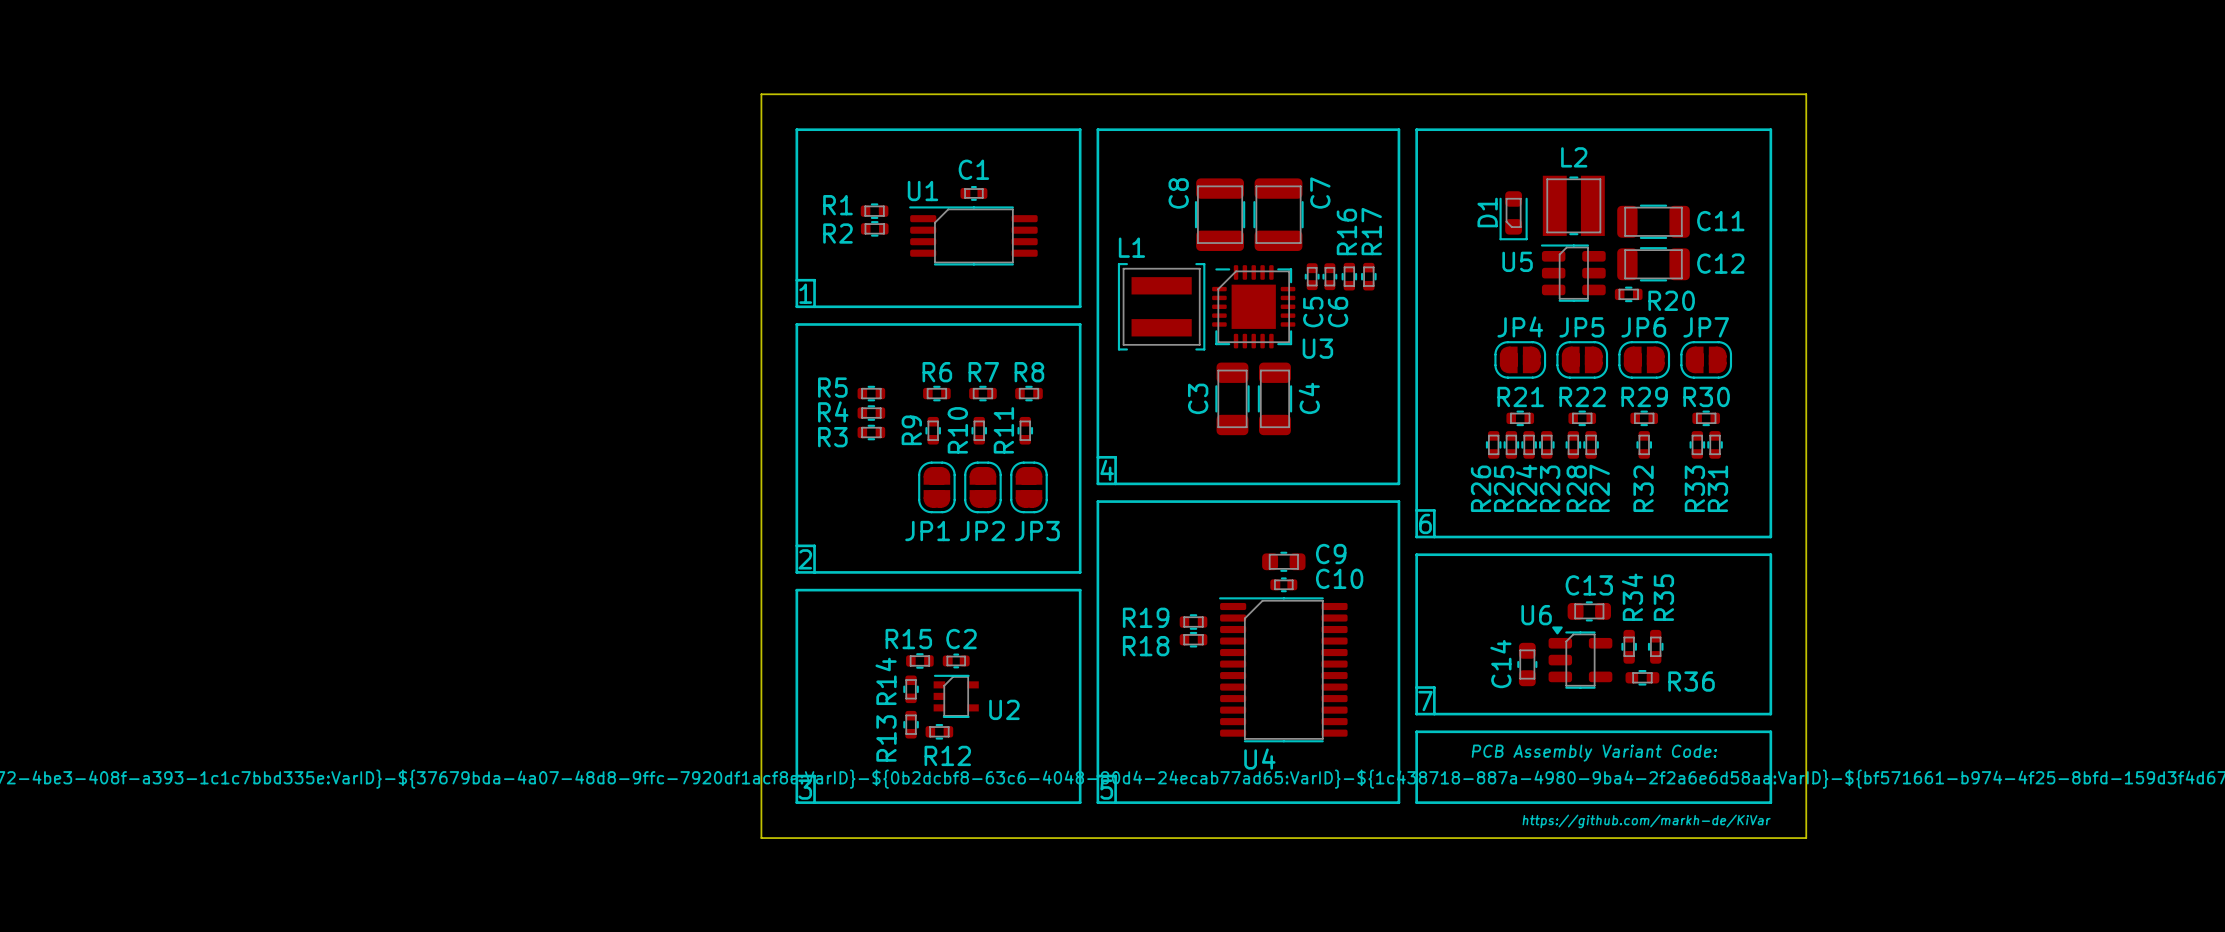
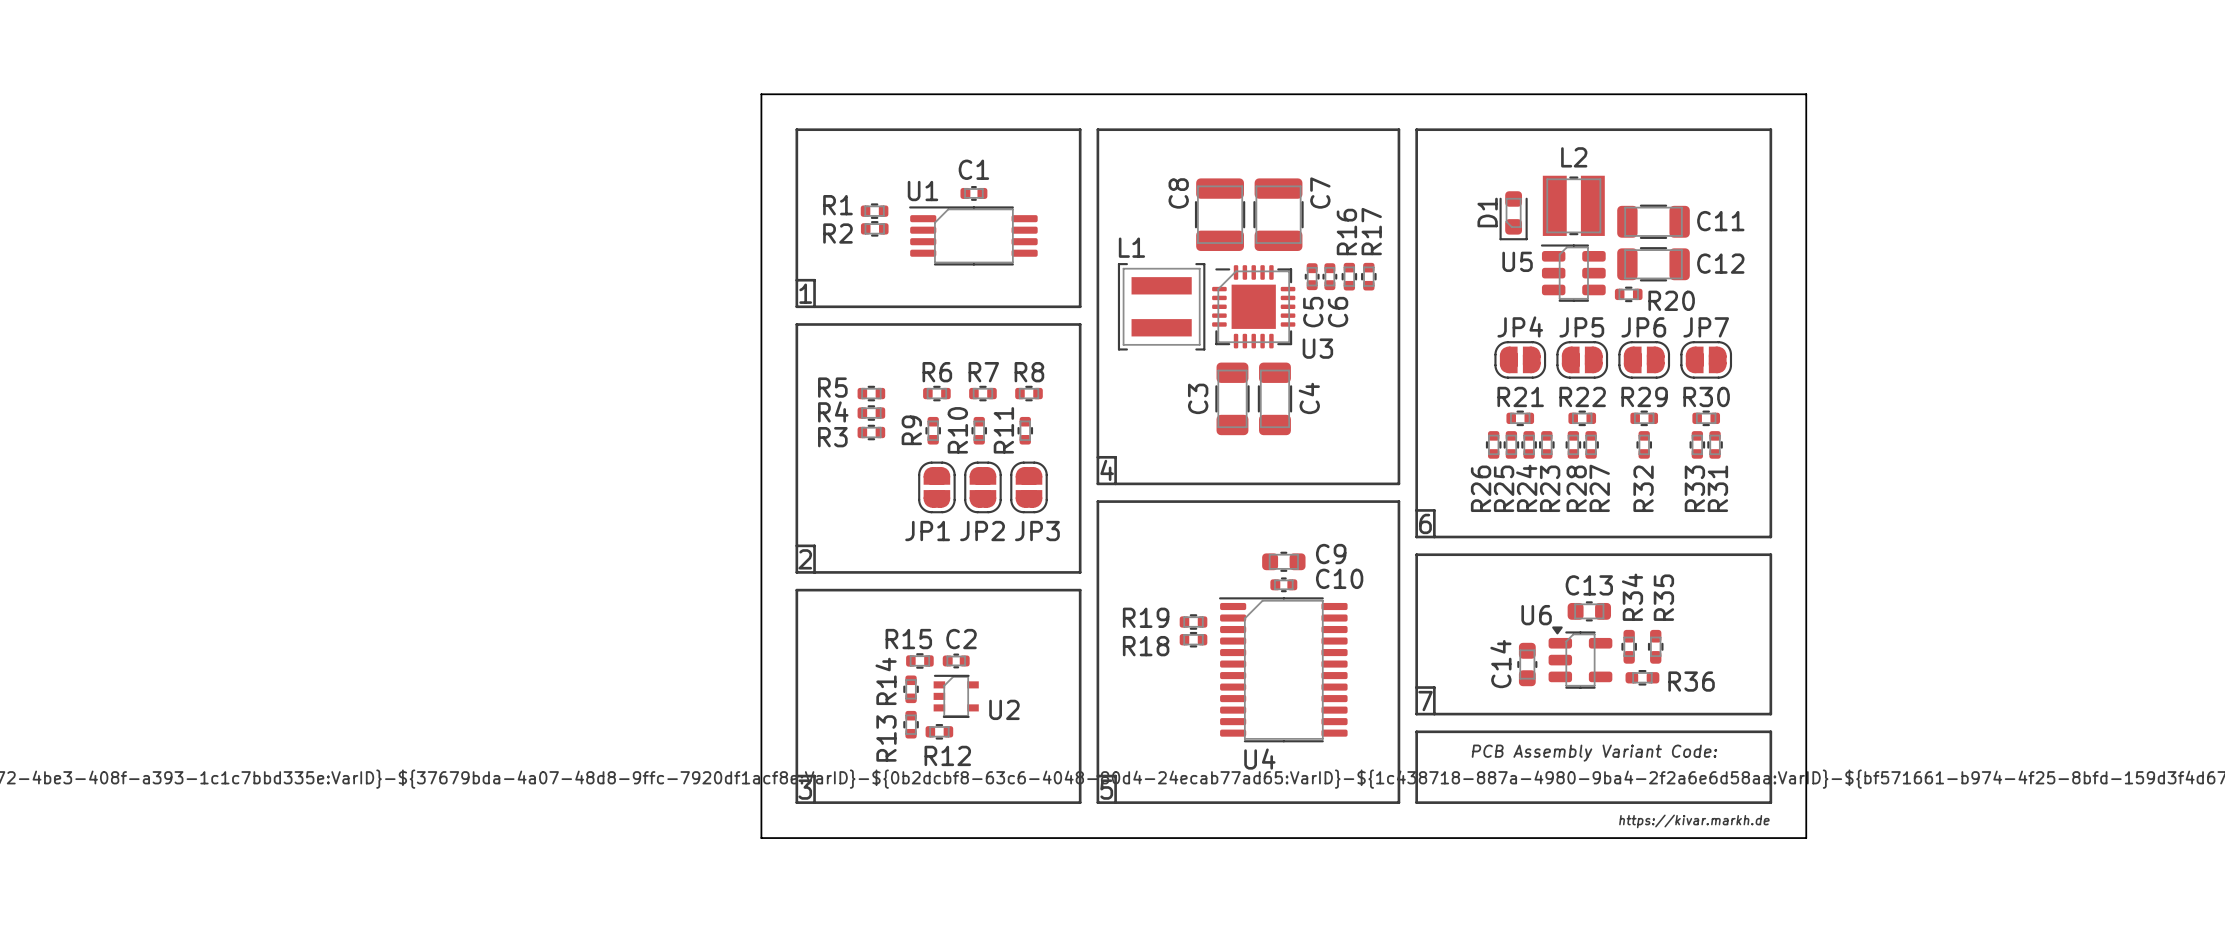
text: https://github.com/markh-de/KiVar (1646, 821) -> https://kivar.markh.de (1694, 821)

